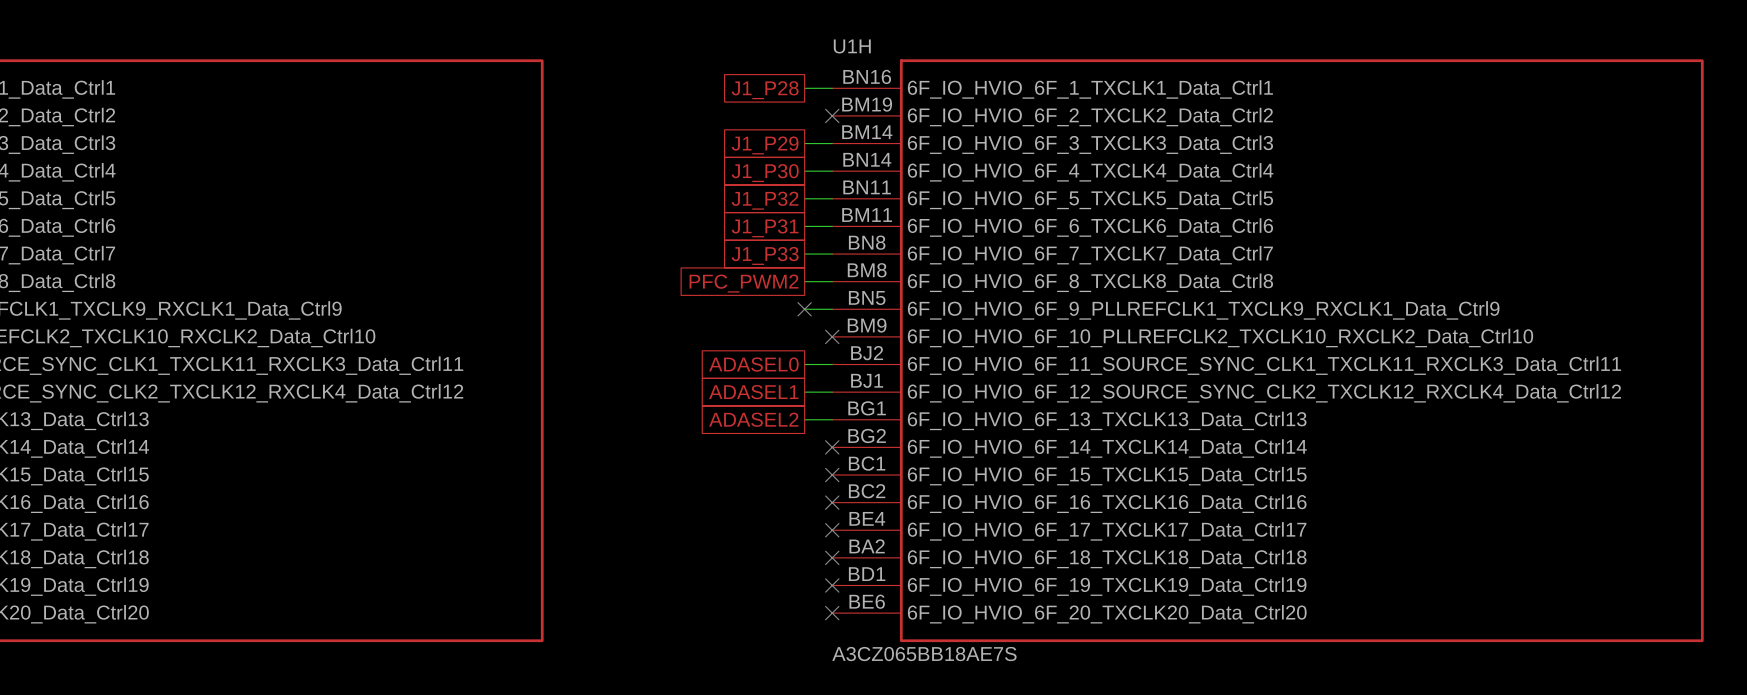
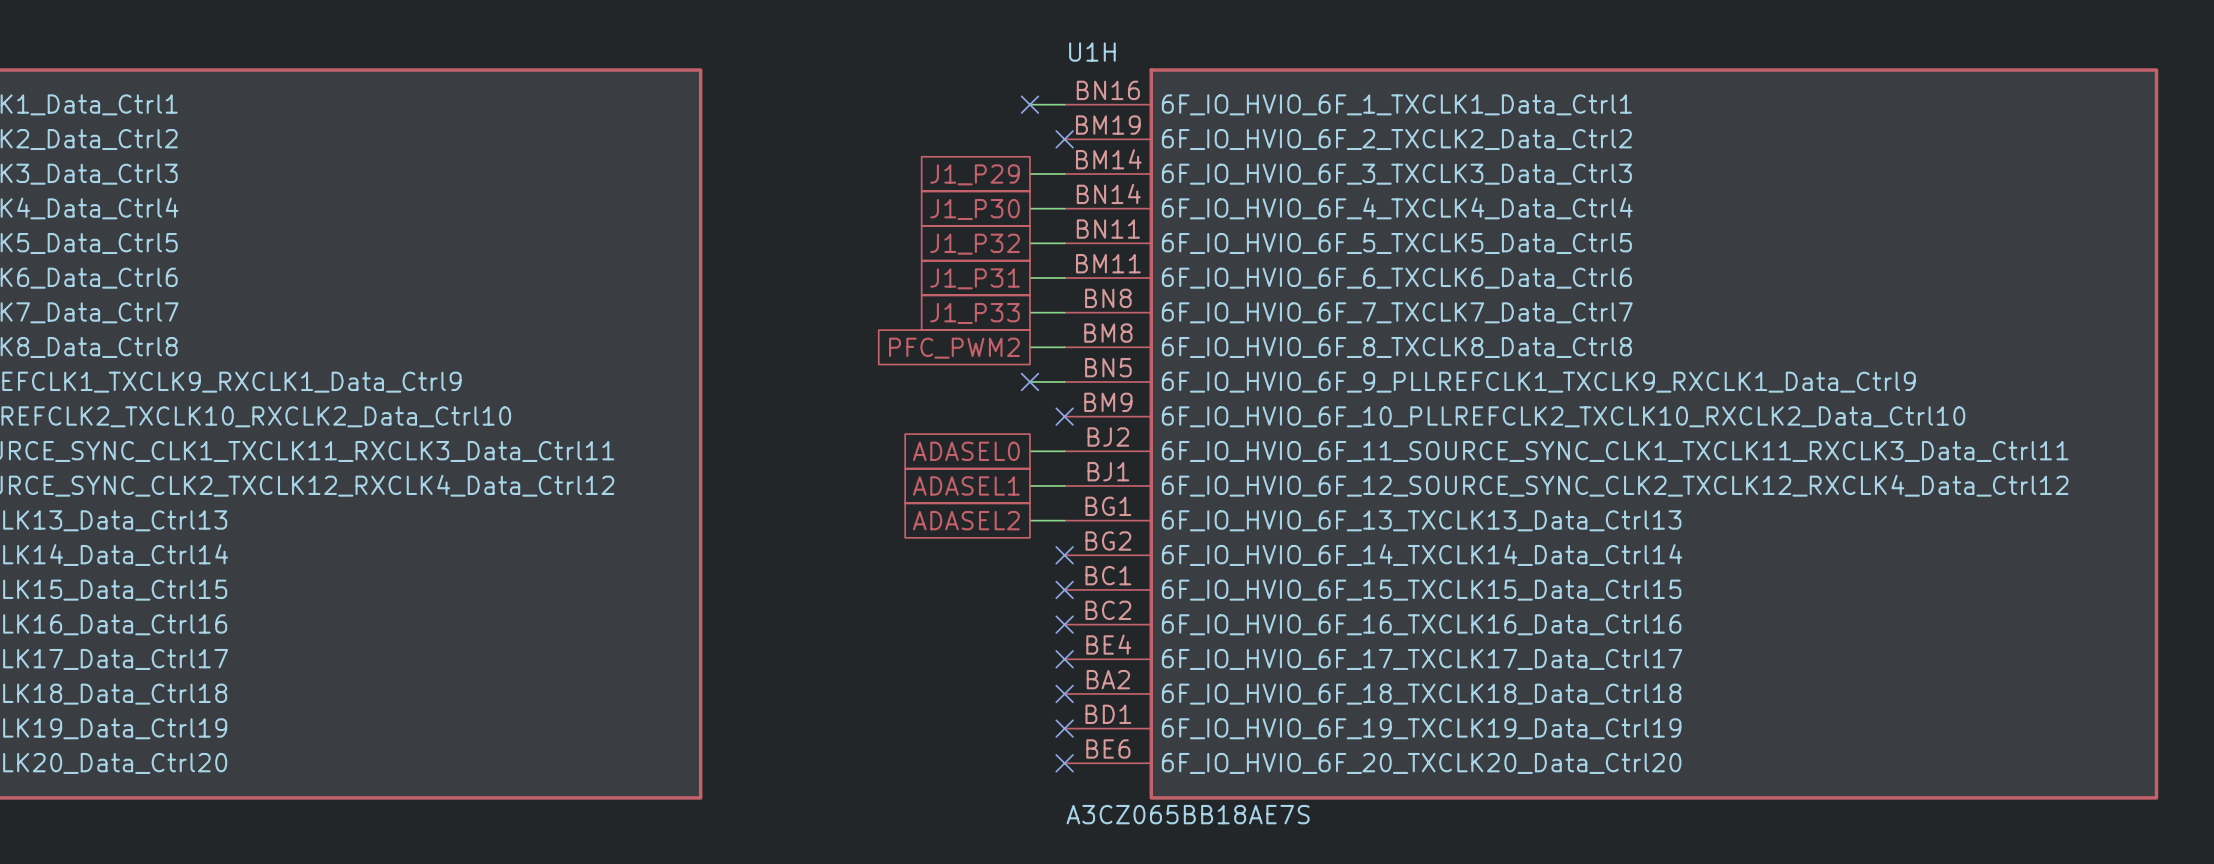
no-connect mark: none -> (1029, 104)
global label: J1_P28 (765, 90) -> none

